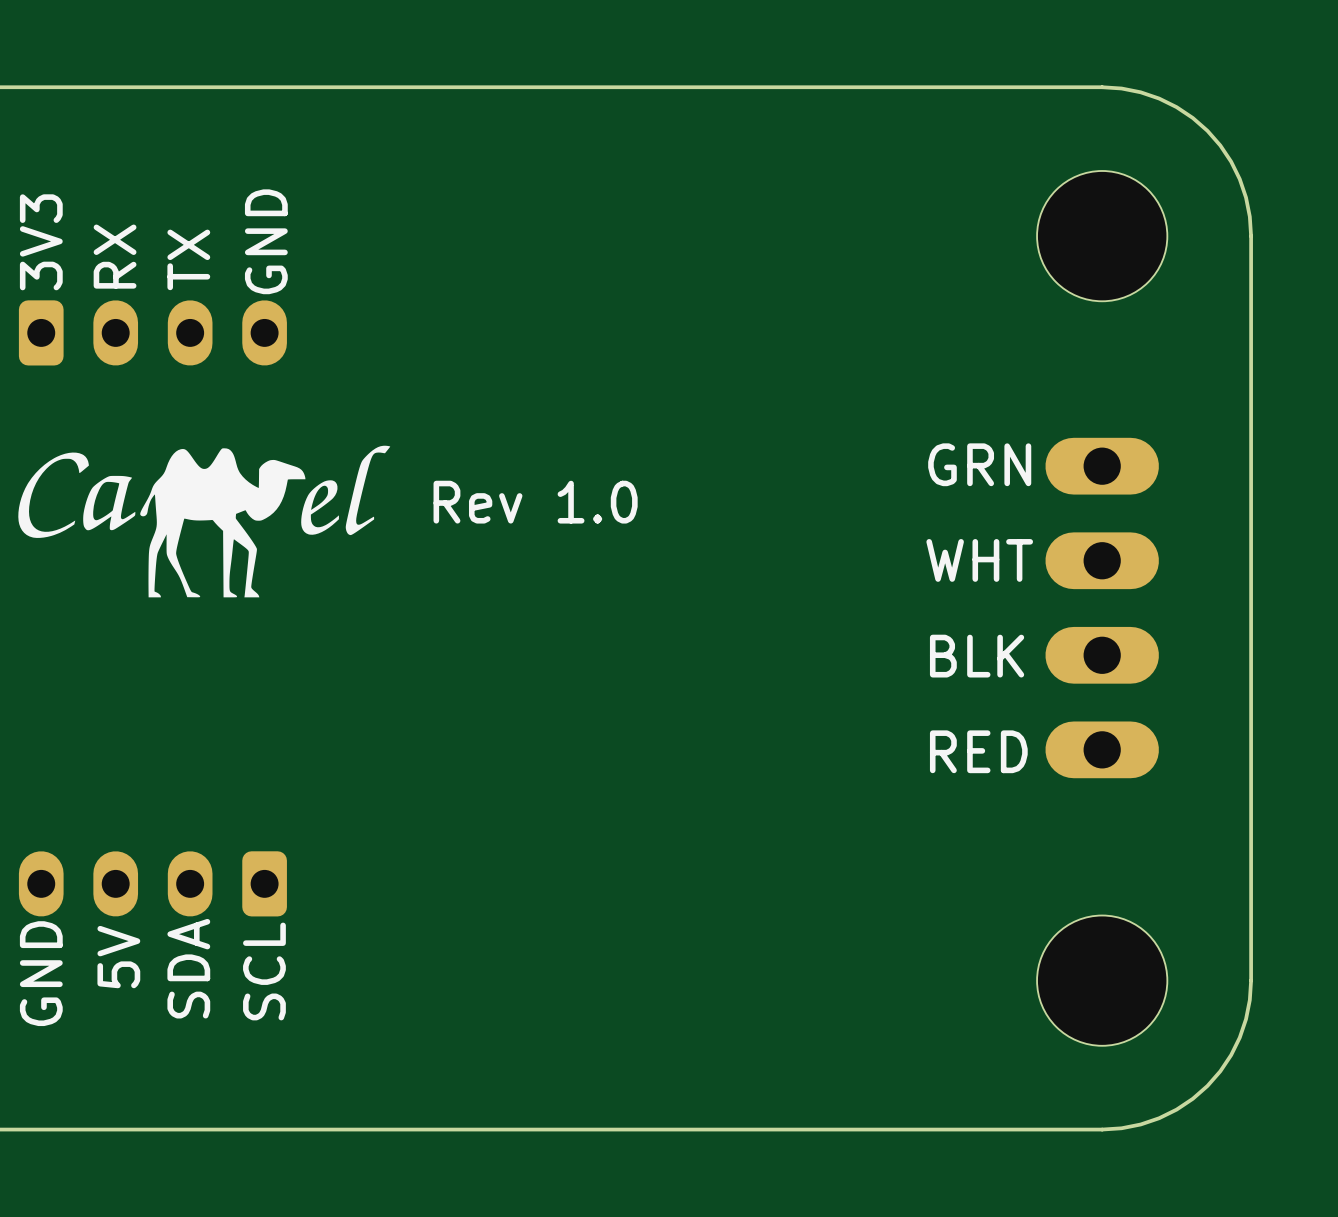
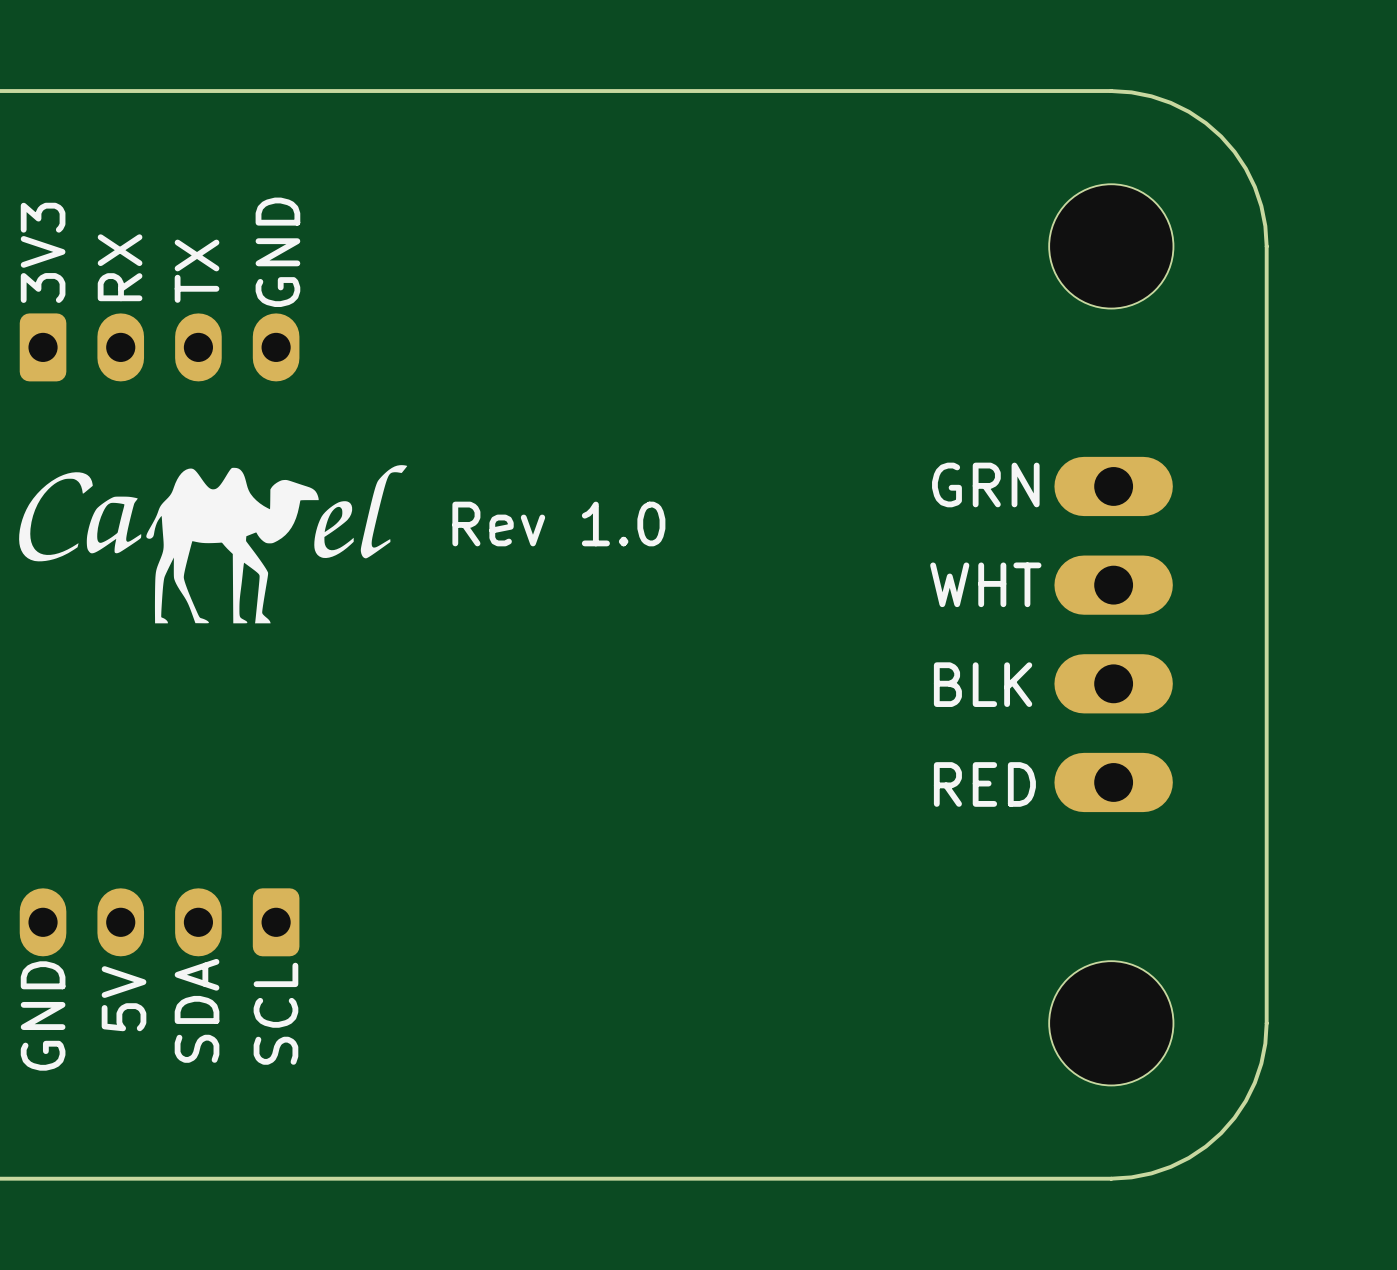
board edge: (1064, 87) (1121, 88) (1140, 92) (1159, 98) (1192, 117) (1220, 145) (1231, 161) (1246, 197) (1251, 236) (1251, 980) (1246, 1019) (1239, 1037) (1220, 1071) (1192, 1098) (1176, 1109) (1140, 1124) (1121, 1128) (1064, 1129) -> (1111, 91) (1131, 92) (1170, 102) (1188, 111) (1221, 136) (1245, 168) (1254, 186) (1265, 226) (1266, 246) (1265, 1043) (1261, 1063) (1245, 1101) (1221, 1133) (1188, 1157) (1170, 1166) (1151, 1173) (1111, 1178)
part footprint: [1037, 170, 1168, 302] -> [1049, 184, 1174, 309]
text position: GRN (979, 464) -> GRN (985, 484)
text position: WHT (979, 560) -> WHT (985, 584)
part position: (1102, 608) -> (1113, 634)
text position: BLK (977, 656) -> BLK (983, 684)
text position: RED (978, 751) -> RED (984, 784)
part footprint: [1037, 915, 1168, 1046] -> [1049, 961, 1174, 1086]

